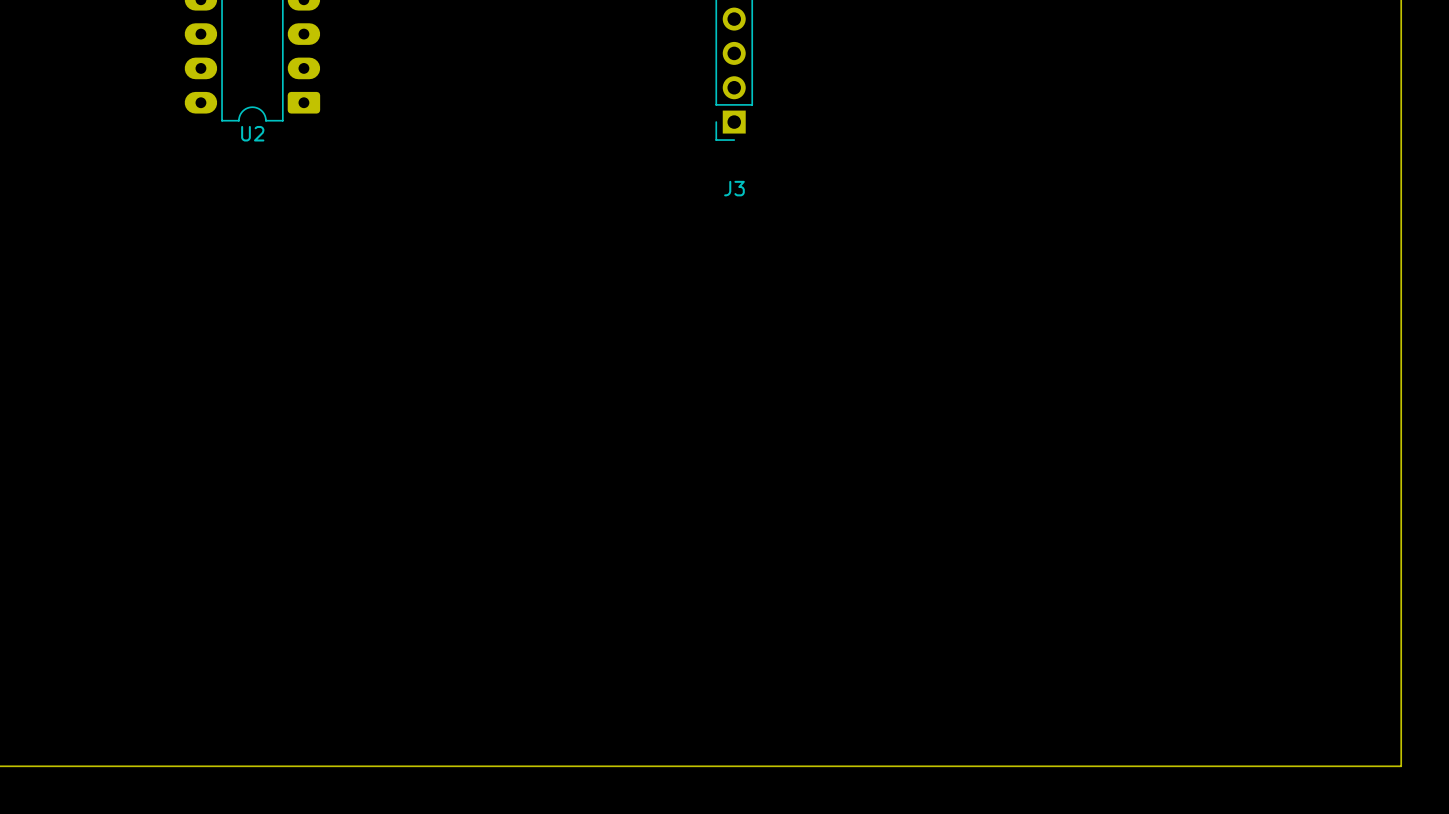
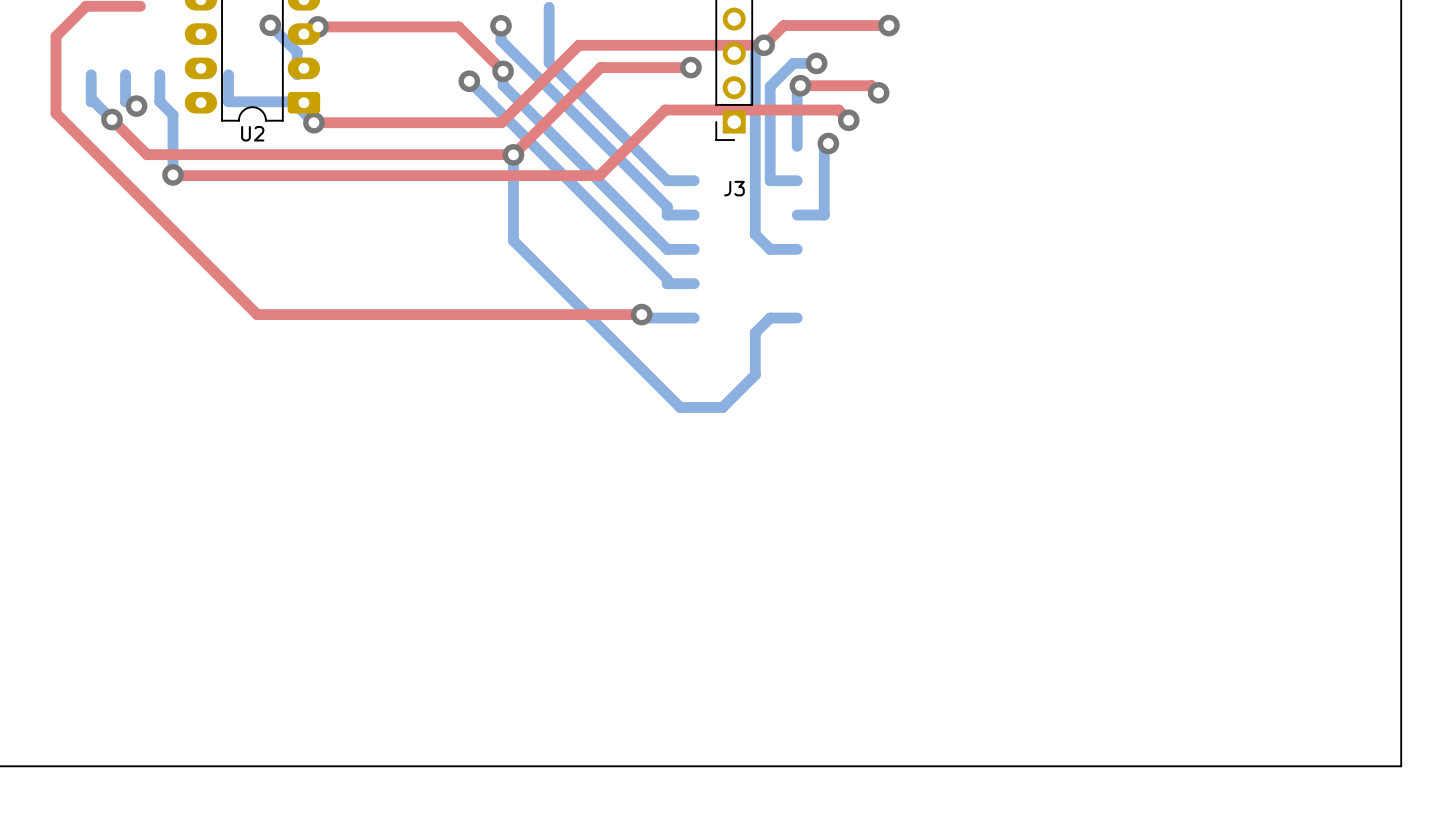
top track: none -> (140, 6) (86, 6) (56, 36) (56, 113) (257, 314) (641, 314)
bottom track: none -> (549, 7) (549, 62) (667, 180) (694, 180)
bottom track: none -> (270, 25) (297, 52) (297, 74)
via: none -> (270, 25)
bottom track: none -> (500, 25) (500, 40) (667, 206) (667, 215) (694, 215)
via: none -> (500, 25)
top track: none -> (888, 25) (783, 25) (764, 45) (578, 45) (501, 122) (313, 122)
via: none -> (888, 25)
top track: none -> (317, 26) (458, 26) (503, 71)
via: none -> (317, 26)
bottom track: none -> (764, 45) (755, 54) (755, 234) (770, 249) (797, 249)
via: none -> (764, 45)
bottom track: none -> (816, 63) (793, 63) (770, 86) (770, 180) (797, 180)
via: none -> (816, 63)
top track: none -> (690, 67) (600, 67) (513, 154) (147, 154) (112, 119)
via: none -> (690, 67)
bottom track: none -> (503, 71) (503, 85) (667, 249) (694, 249)
via: none -> (503, 71)
bottom track: none -> (91, 74) (91, 101) (94, 101) (112, 119)
bottom track: none -> (125, 74) (125, 101) (132, 101) (136, 106)
bottom track: none -> (159, 74) (159, 101) (172, 114) (172, 174)
bottom track: none -> (228, 74) (228, 101) (293, 101) (313, 122)
bottom track: none -> (469, 81) (667, 279) (667, 283) (694, 283)
via: none -> (469, 81)
top track: none -> (800, 85) (871, 85) (878, 92)
bottom track: none -> (800, 85) (797, 88) (797, 146)
via: none -> (800, 85)
via: none -> (878, 92)
via: none -> (136, 106)
via: none -> (112, 119)
top track: none -> (848, 120) (838, 110) (665, 110) (599, 175) (172, 174)
via: none -> (848, 120)
via: none -> (313, 122)
bottom track: none -> (828, 143) (824, 147) (824, 215) (797, 215)
via: none -> (828, 143)
bottom track: none -> (513, 154) (513, 240) (680, 407) (722, 407) (755, 374) (755, 332) (770, 318) (797, 318)
via: none -> (513, 154)
via: none -> (172, 174)
bottom track: none -> (641, 314) (645, 318) (694, 318)
via: none -> (641, 314)

